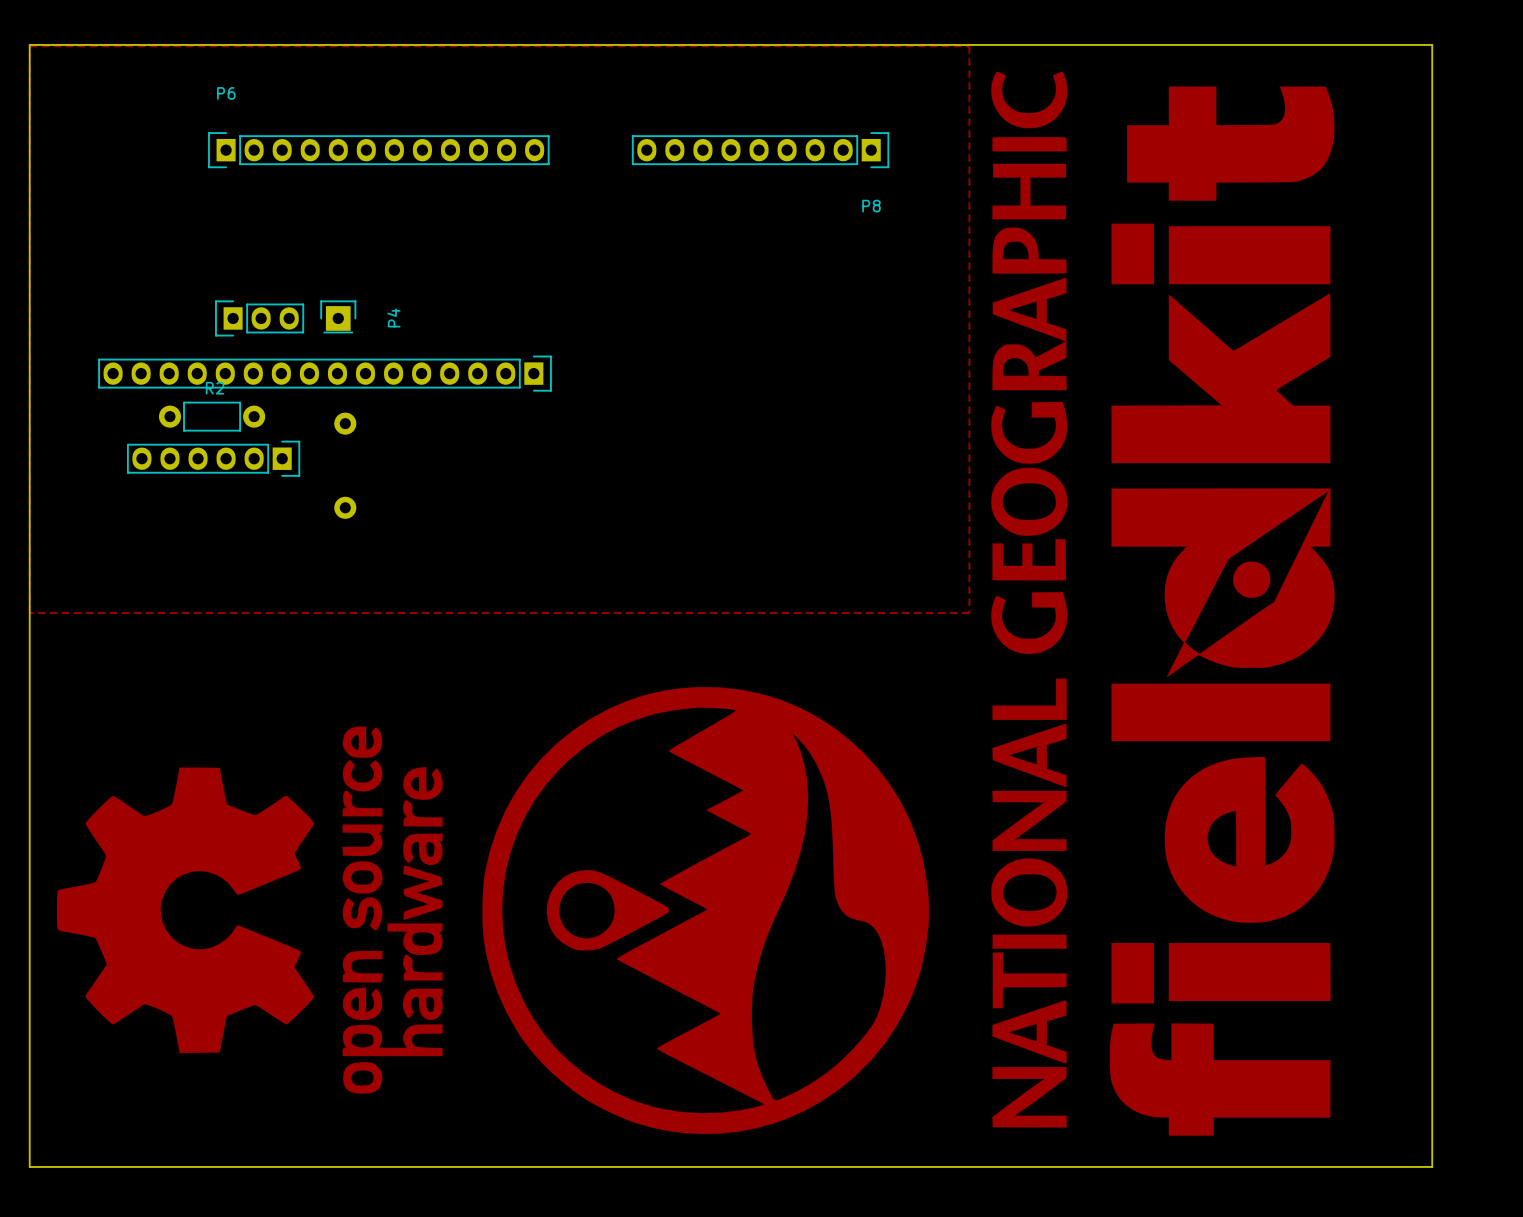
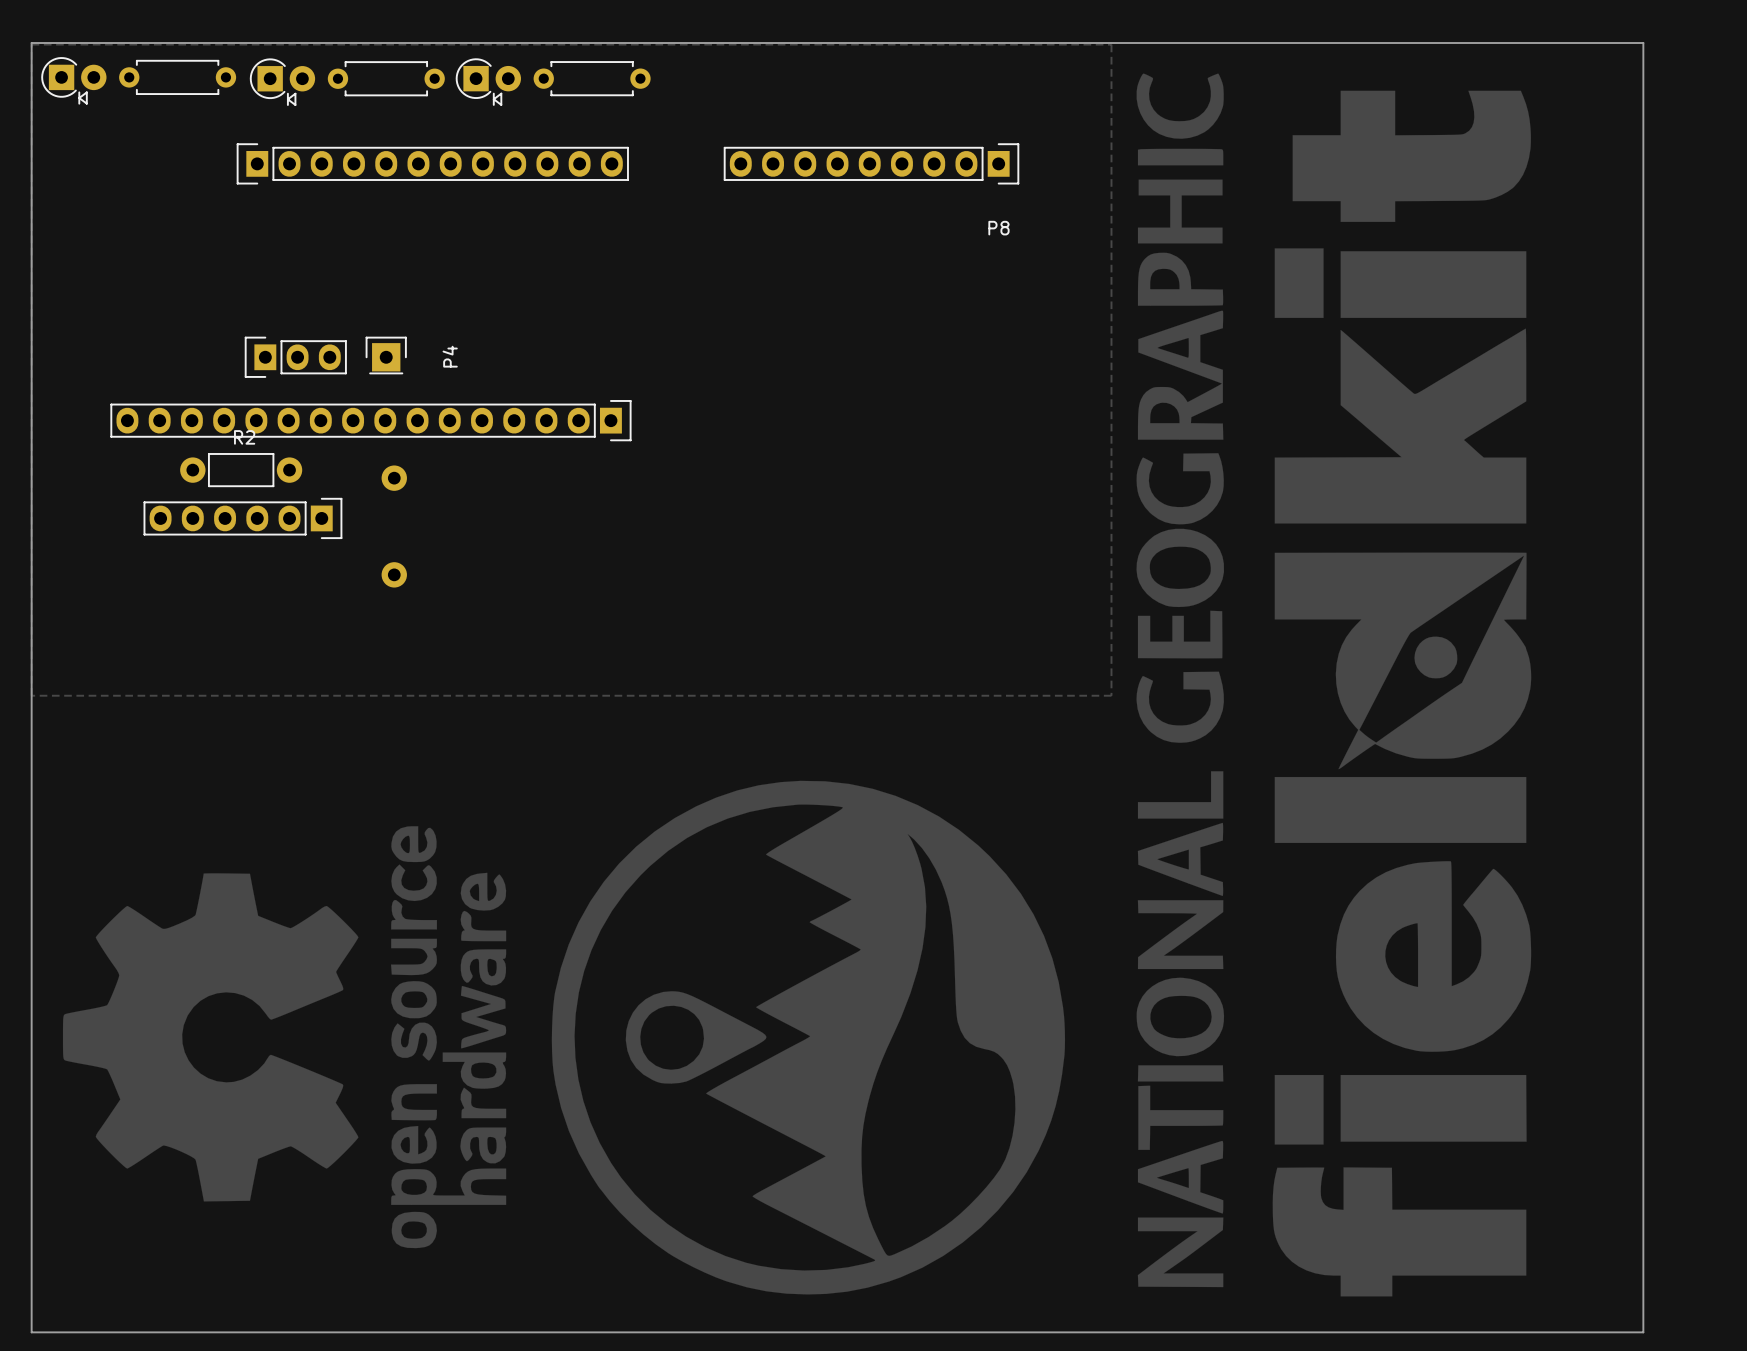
part: none -> (177, 77)
part: none -> (592, 78)
part: none -> (386, 78)
part: none -> (73, 80)
part: none -> (488, 82)
part: none -> (282, 82)
P6 name: P6 (226, 93) -> none

